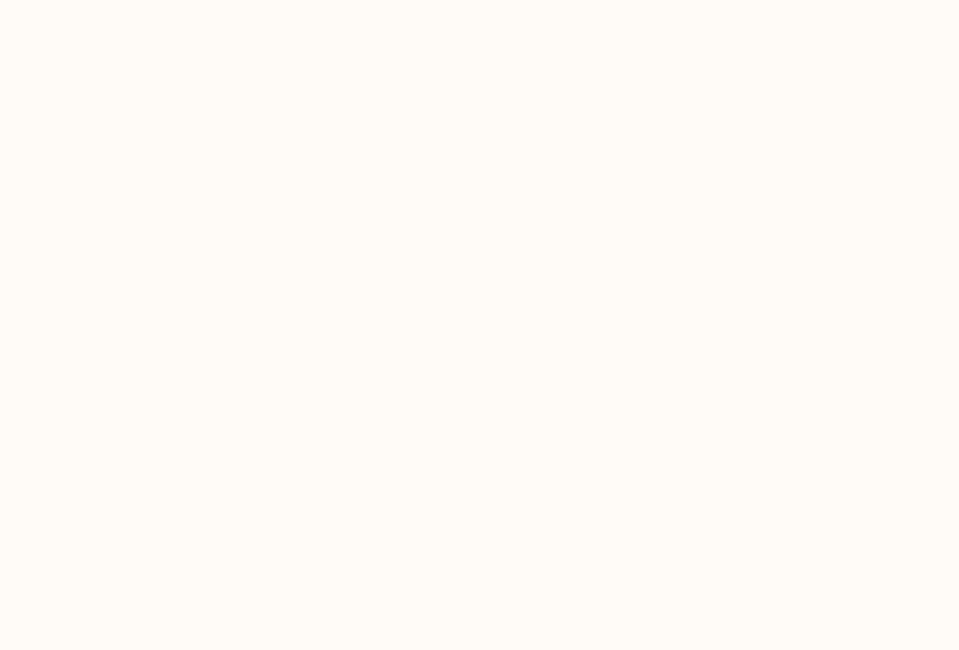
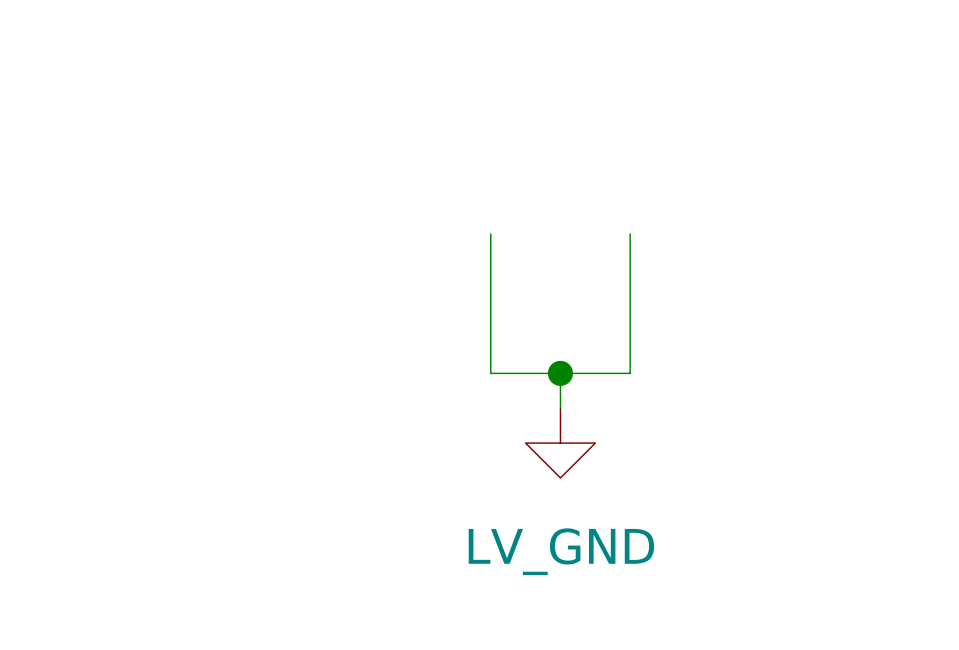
wire: none -> (490, 233) (490, 373) (630, 373) (630, 233)
wire: none -> (560, 373) (560, 408)
junction: none -> (560, 373)
power symbol: none -> LV_GND (560, 443)

